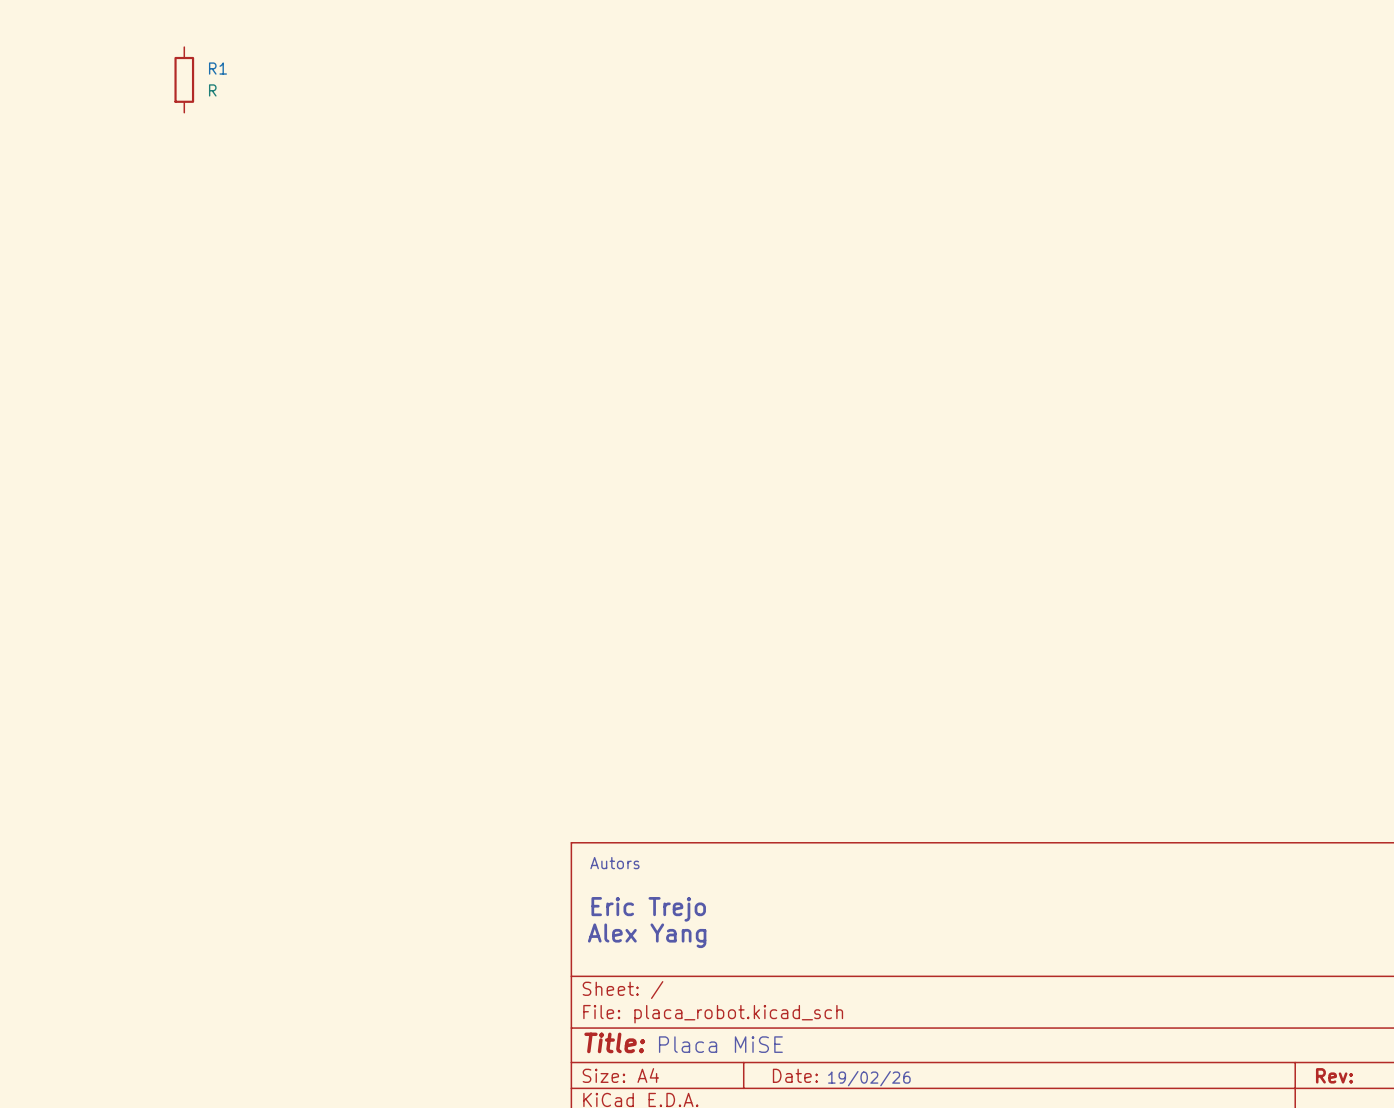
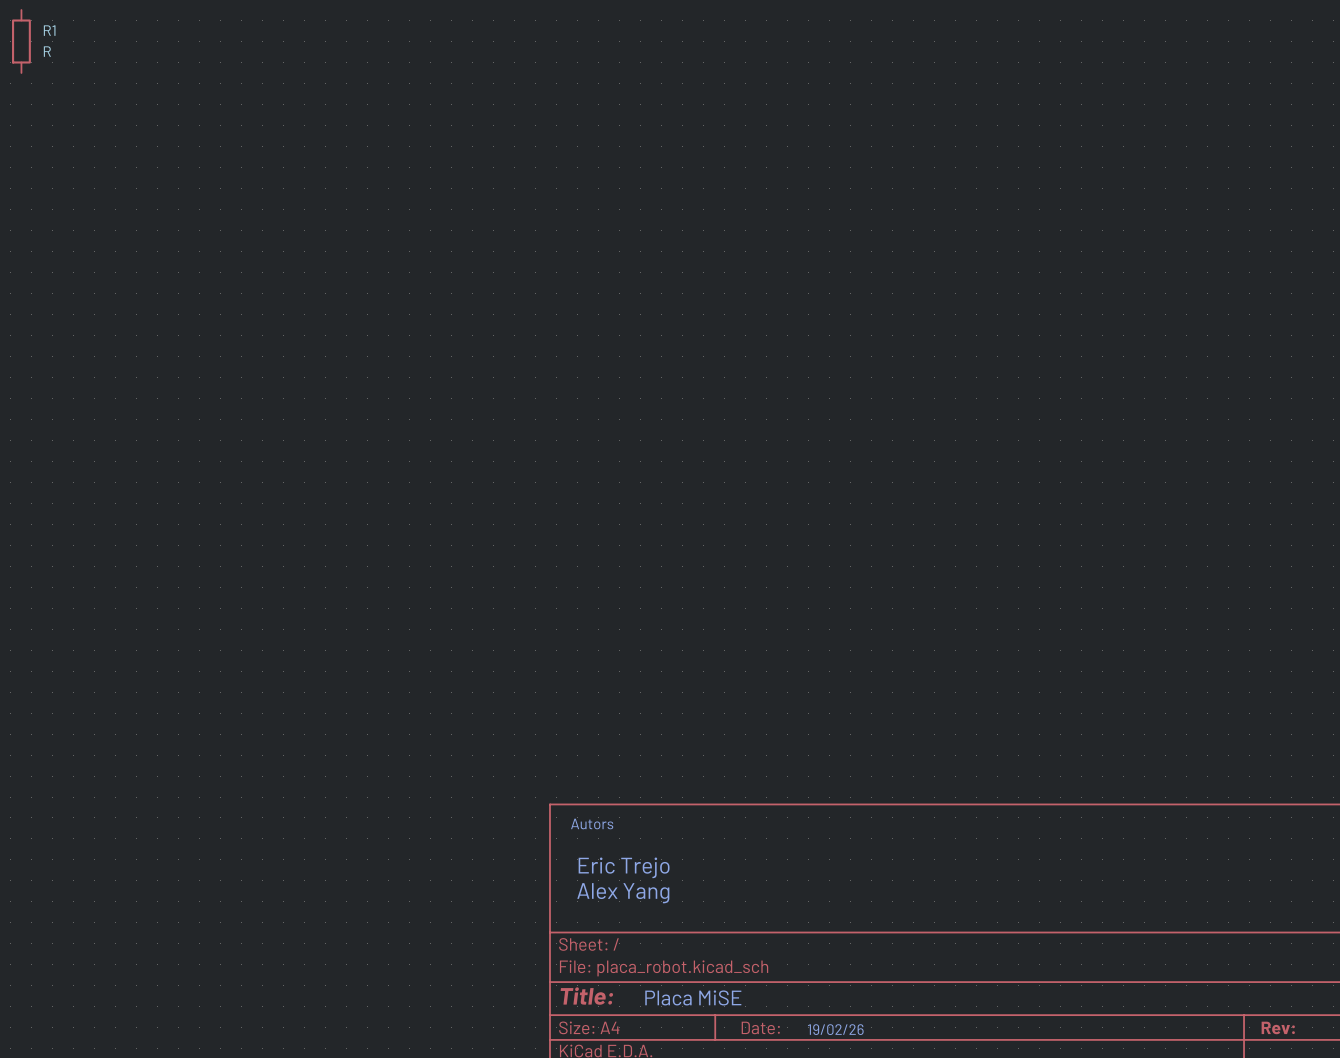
R1 position: (184, 79) -> (21, 41)

